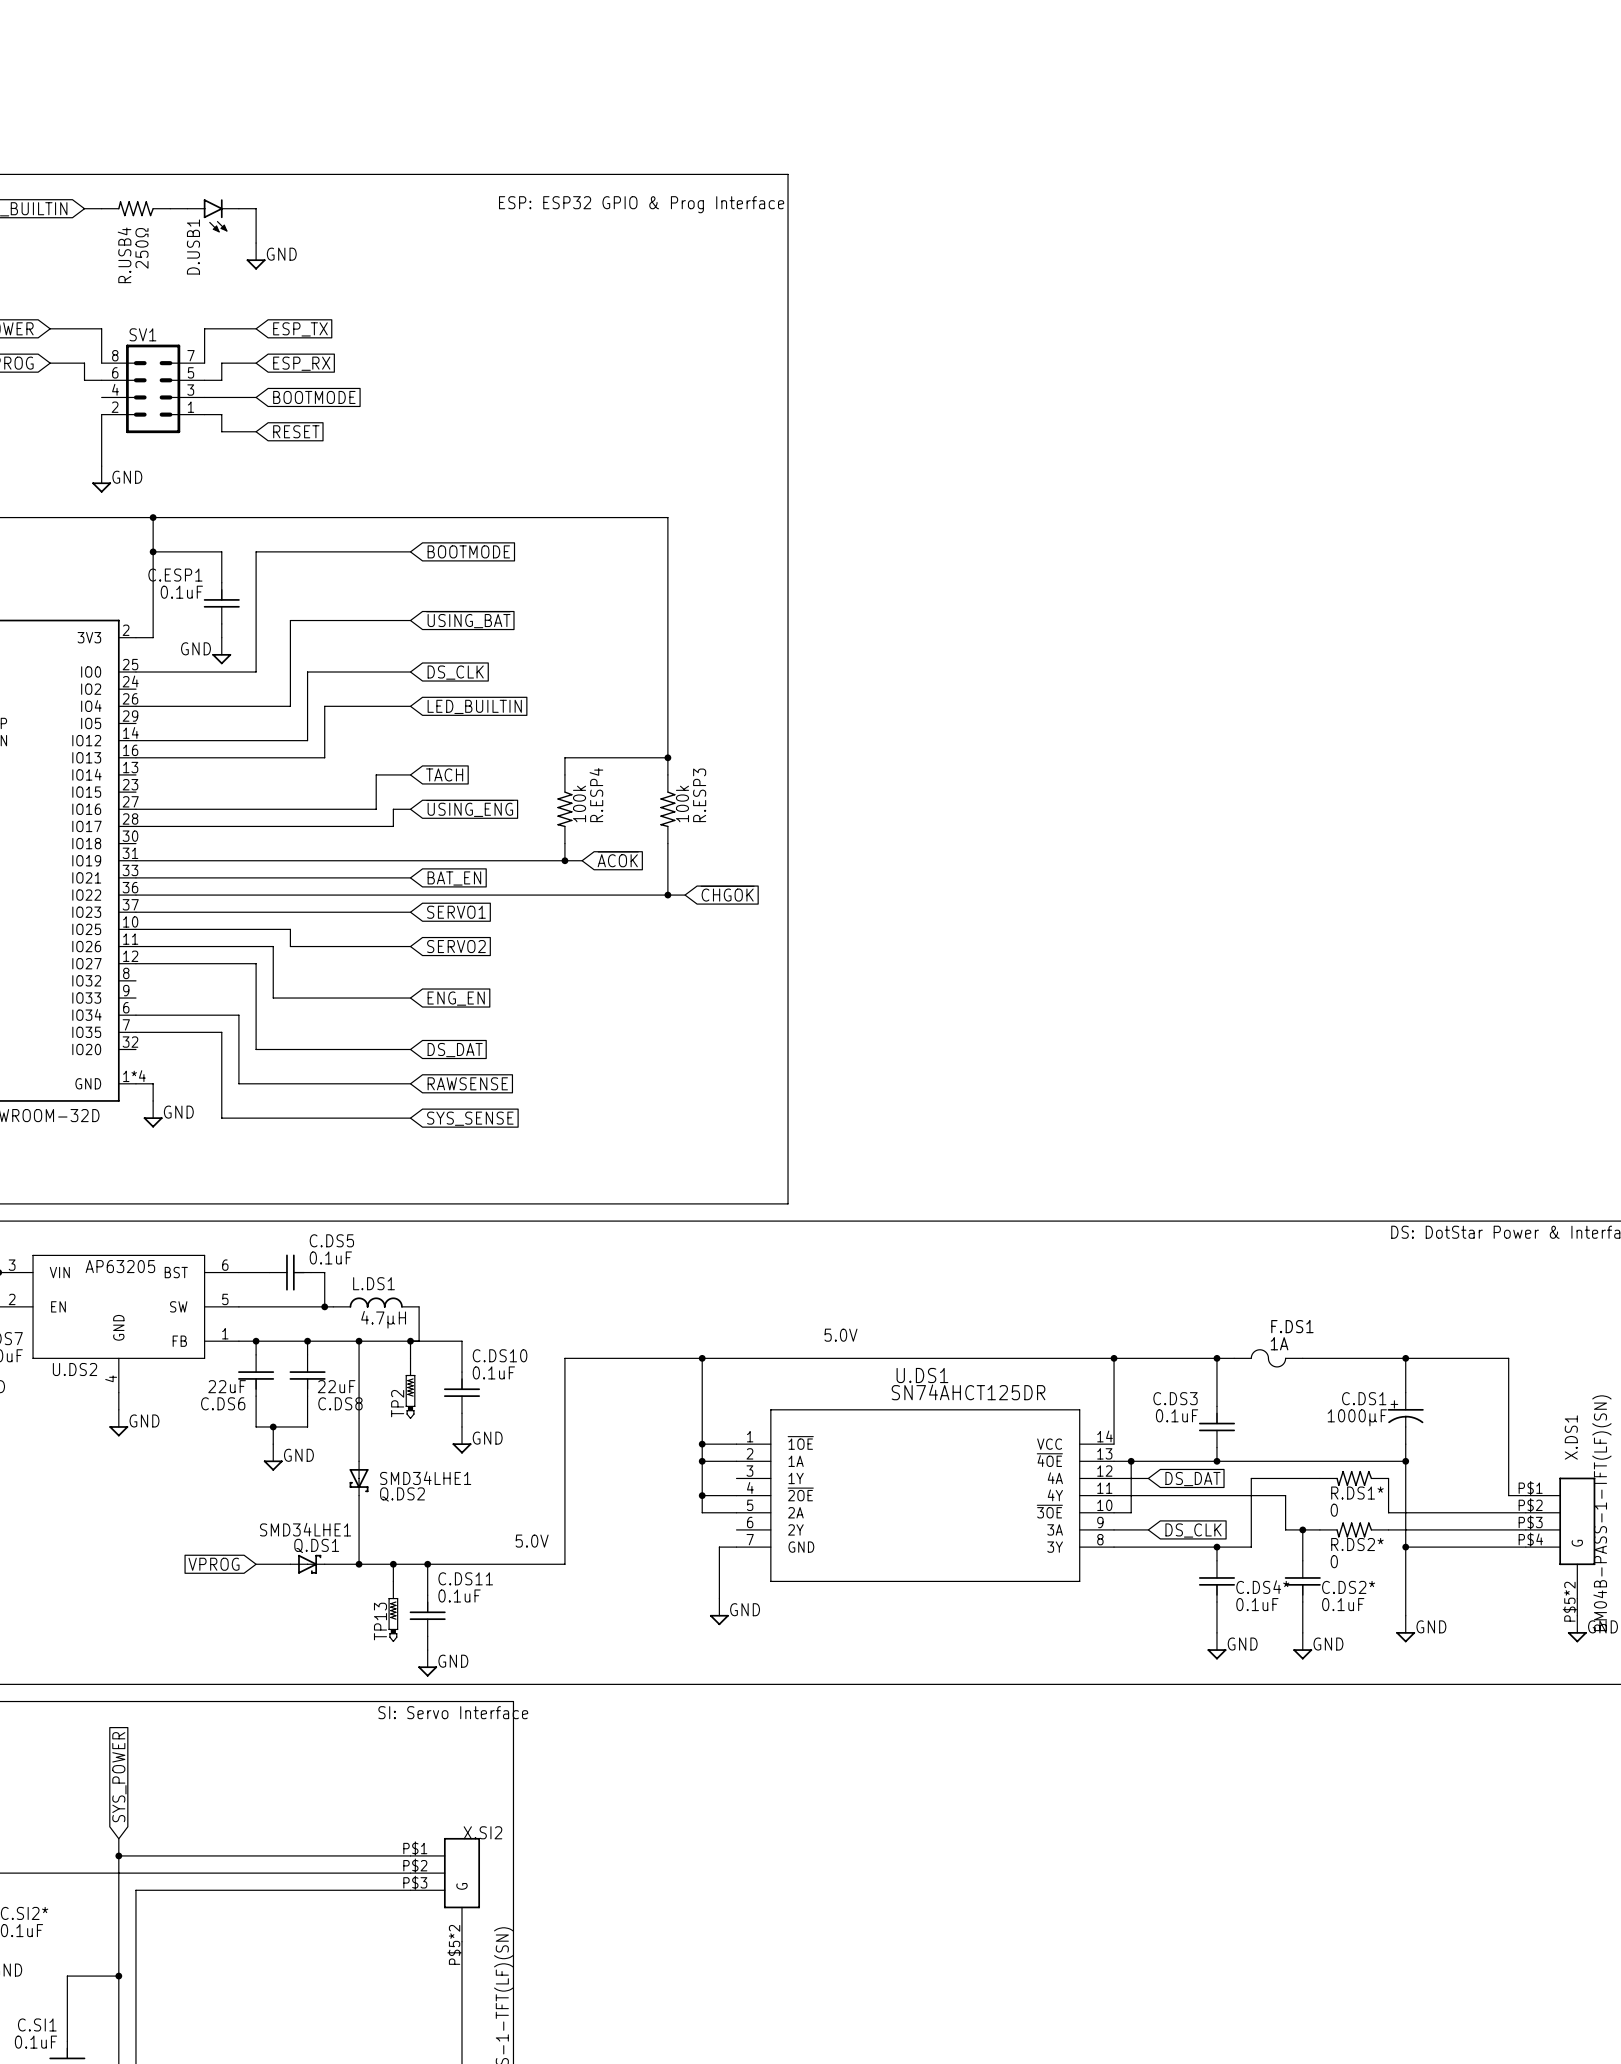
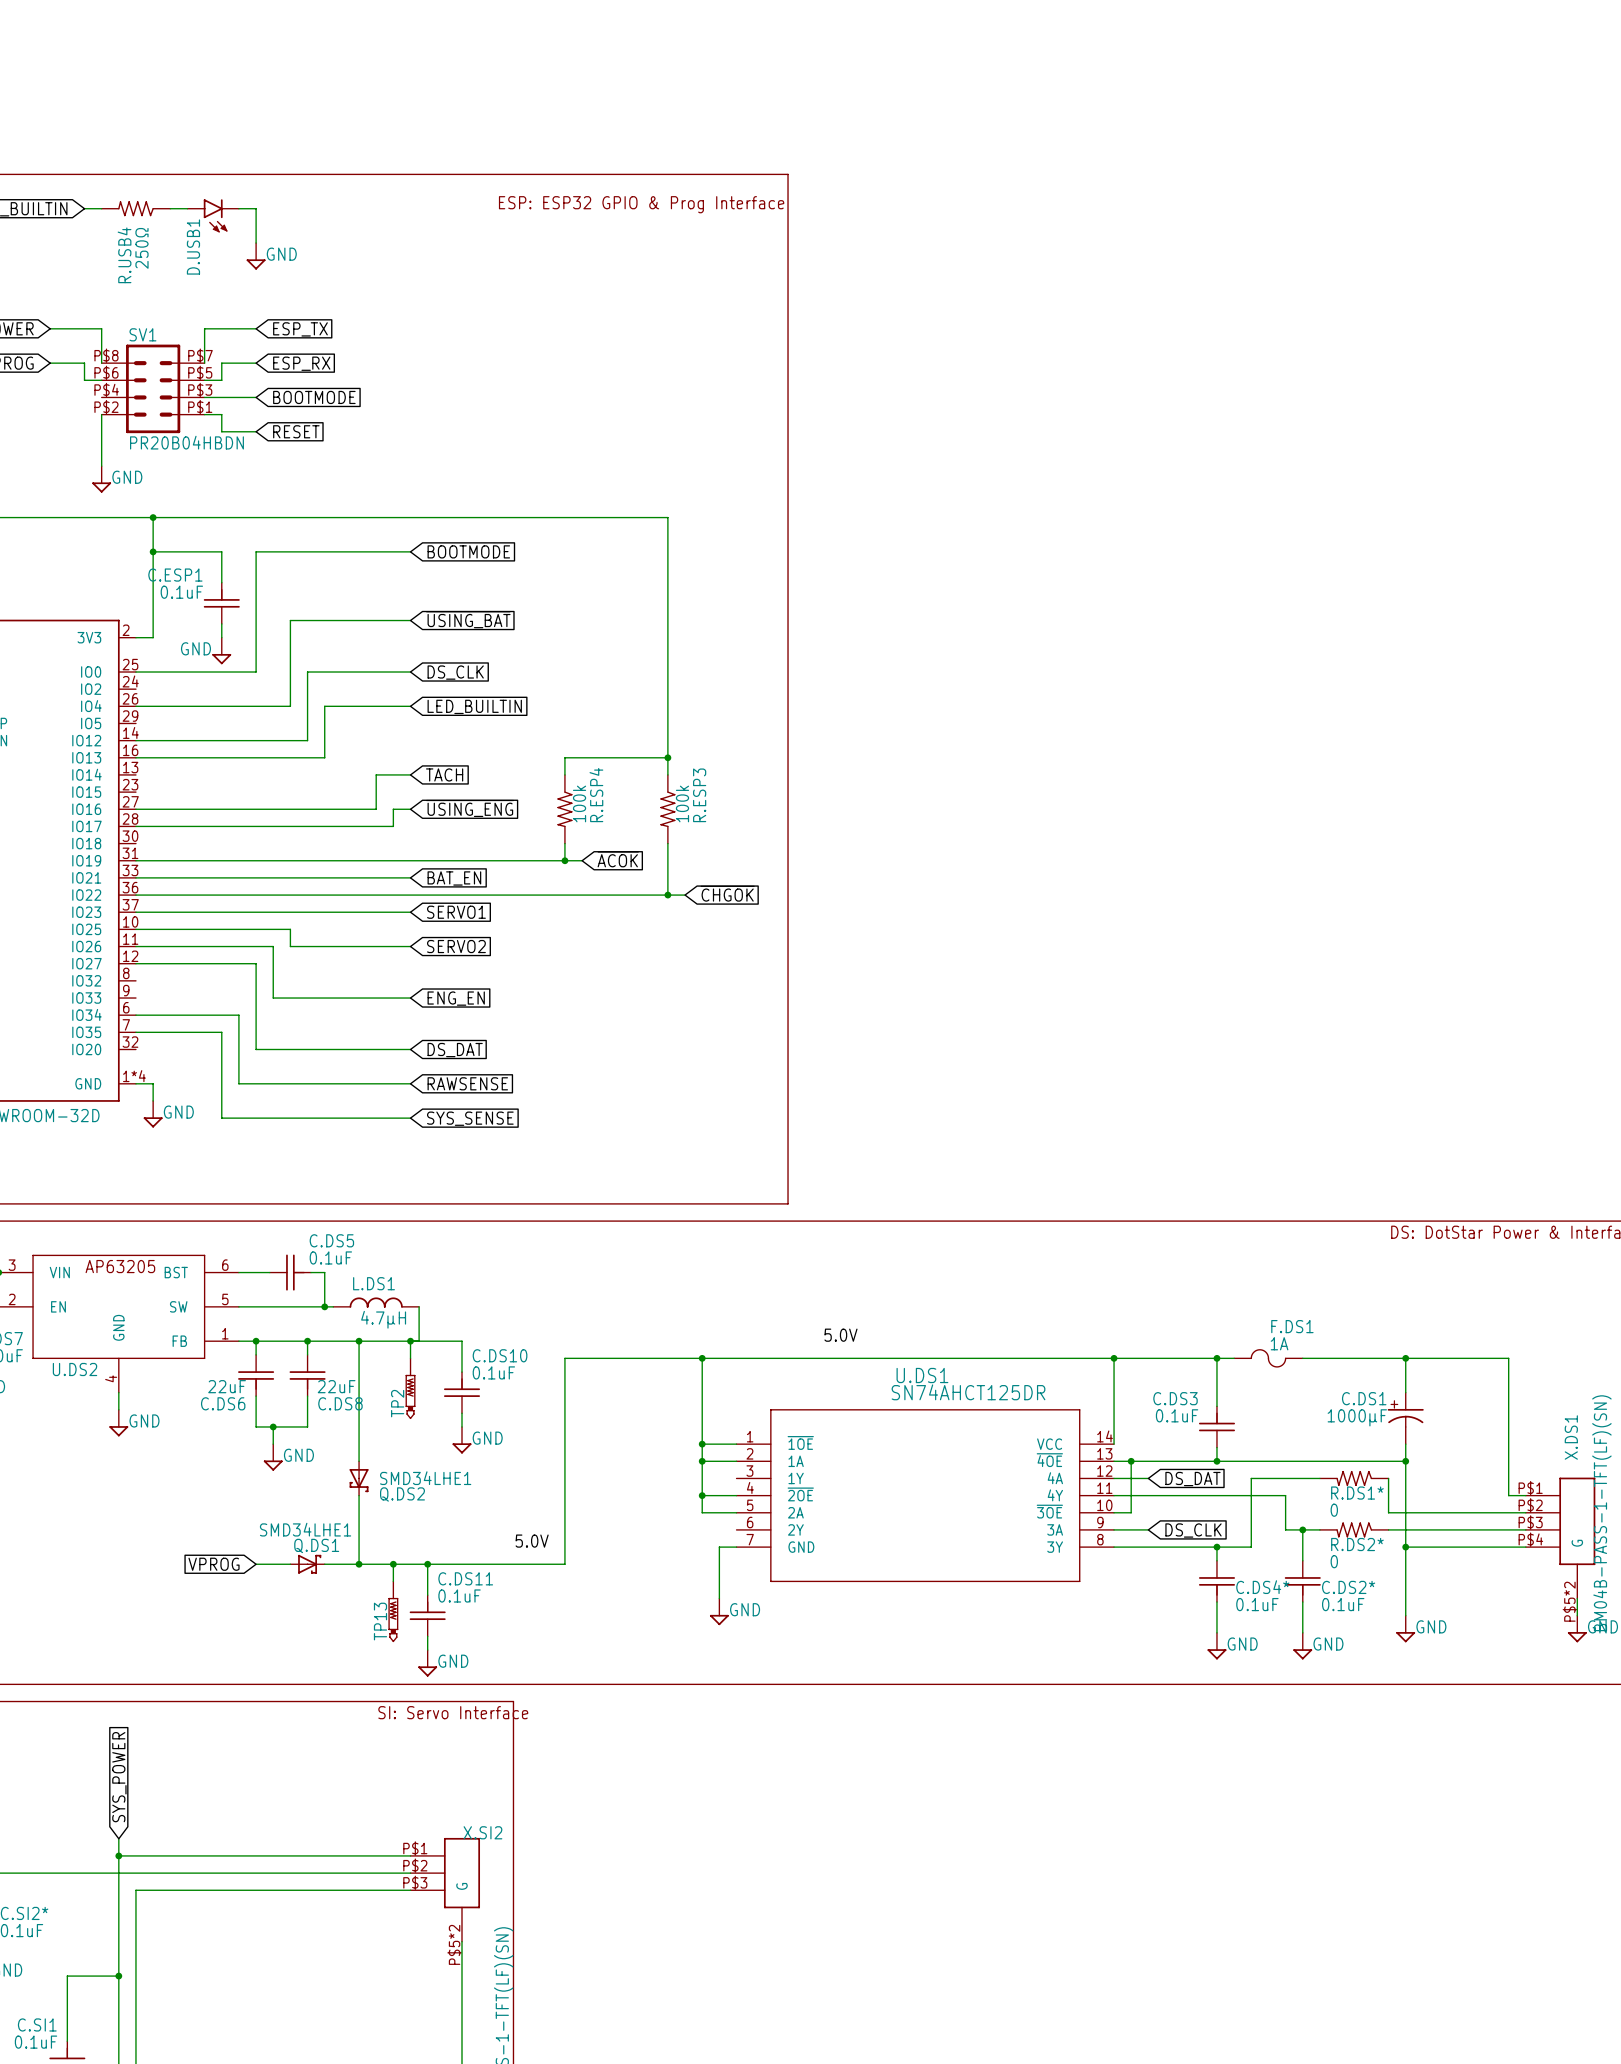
SV1 pin number: 8 (115, 355) -> P$8 (106, 355)
SV1 pin number: 7 (190, 355) -> P$7 (200, 355)
SV1 pin number: 6 (115, 372) -> P$6 (106, 372)
SV1 pin number: 5 (190, 372) -> P$5 (200, 372)
SV1 pin number: 4 (115, 389) -> P$4 (106, 390)
SV1 pin number: 3 (190, 390) -> P$3 (200, 390)
SV1 pin number: 2 (115, 407) -> P$2 (106, 407)
SV1 pin number: 1 (190, 407) -> P$1 (200, 407)
SV1 value: none -> PR20B04HBDN (186, 442)

